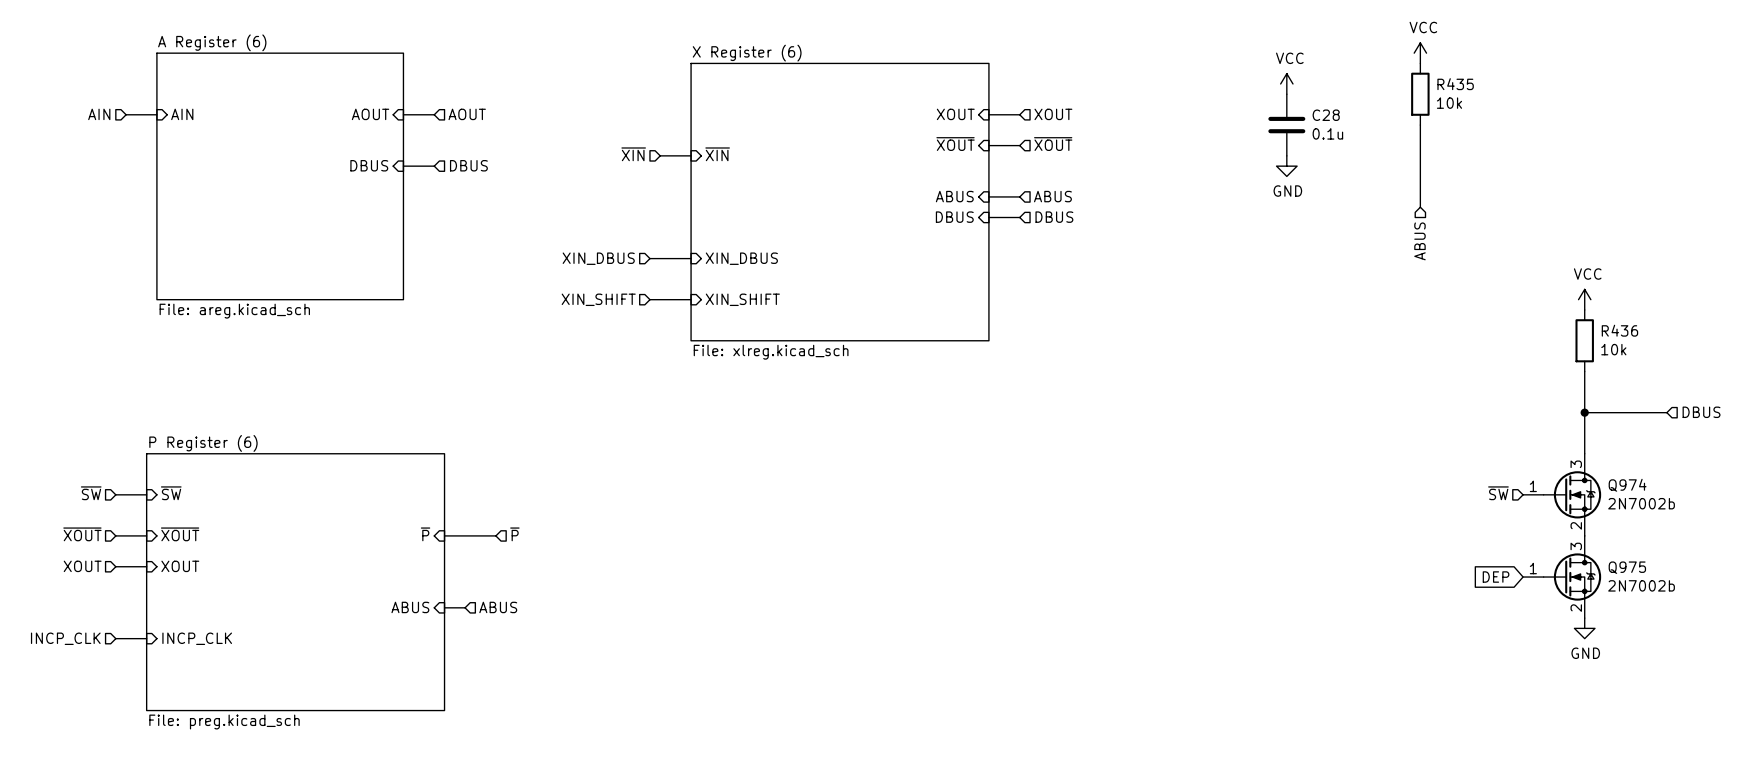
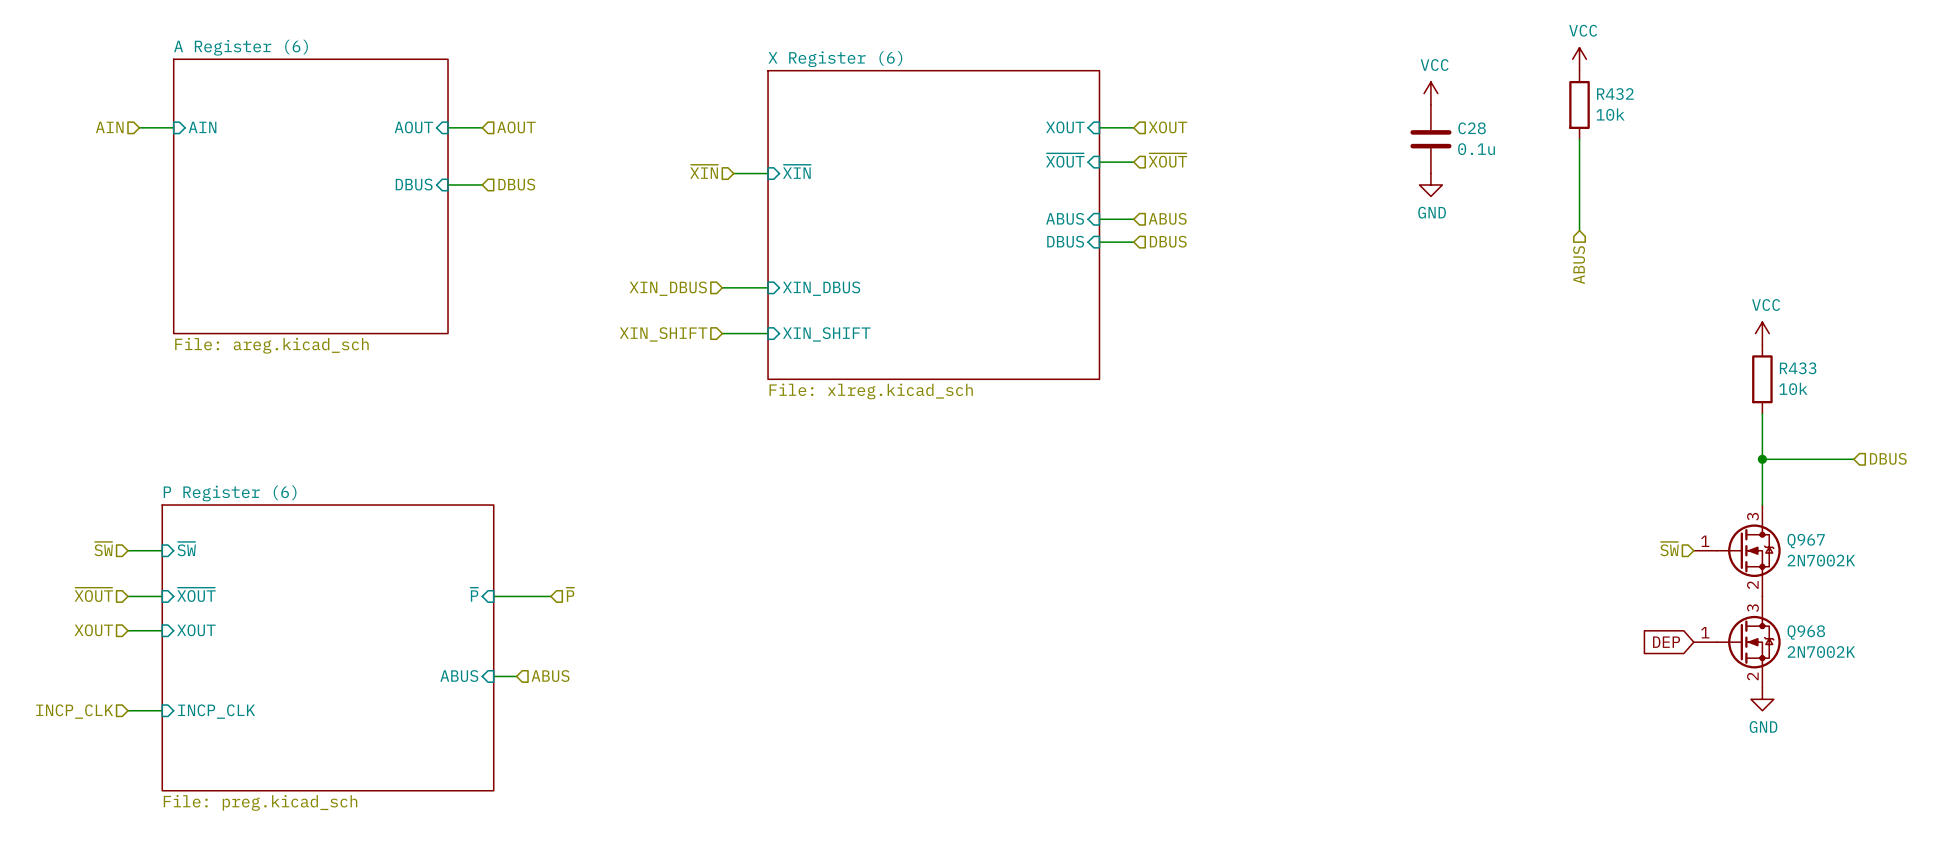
R435 name: R435 (1455, 84) -> R432 (1615, 94)
R436 name: R436 (1619, 330) -> R433 (1798, 368)
Q974 name: Q974 (1627, 485) -> Q967 (1806, 541)
Q974 value: 2N7002b (1641, 503) -> 2N7002K (1821, 560)
Q975 name: Q975 (1627, 567) -> Q968 (1806, 632)
Q975 value: 2N7002b (1641, 585) -> 2N7002K (1821, 652)

